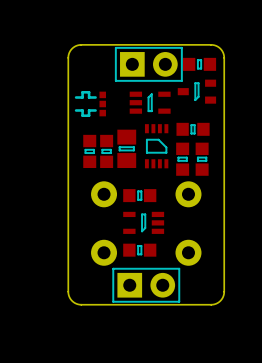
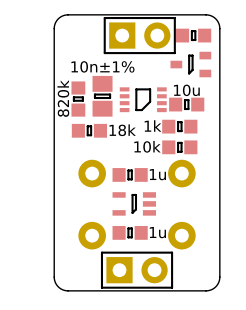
line: (76, 97) (82, 97) (82, 92) (89, 92) (89, 97) (95, 97) -> none
part: (150, 102) -> none
part: (102, 104) -> none
line: (76, 110) (82, 110) (82, 115) (89, 115) (89, 110) (95, 110) -> none
part value: none -> 10u (186, 90)
part: none -> 10n±1% (102, 96)
part: none -> 820k (78, 99)
part rotation: 0° (156, 146) -> 90° clockwise (143, 99)
part: (126, 148) -> none
part: none -> 1k (179, 126)
part: (89, 151) -> none
part rotation: 0° (106, 151) -> 90° clockwise (89, 130)
part value: none -> 18k (122, 130)
part: (182, 159) -> none
part: (202, 159) -> none
part: none -> 10k (179, 147)
part value: none -> 1u (157, 174)
part value: none -> 1u (157, 232)

